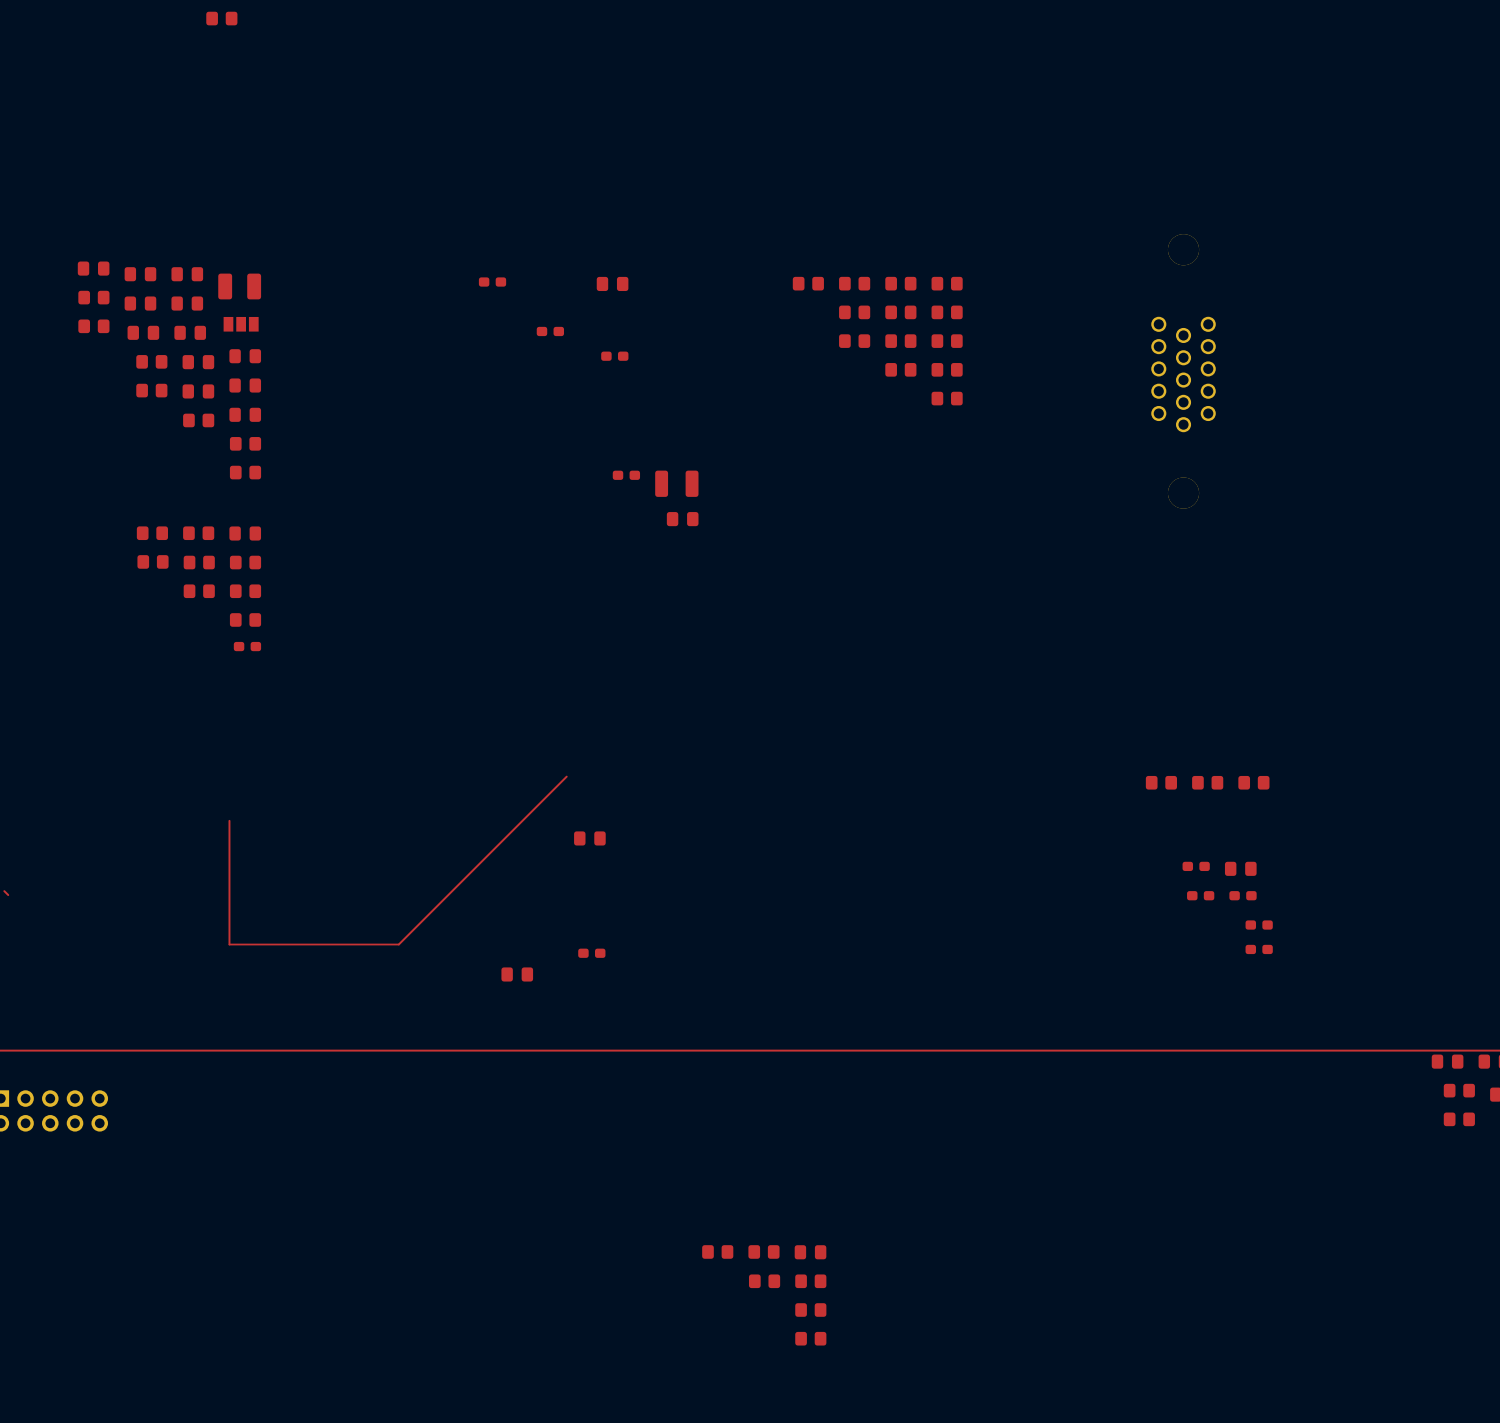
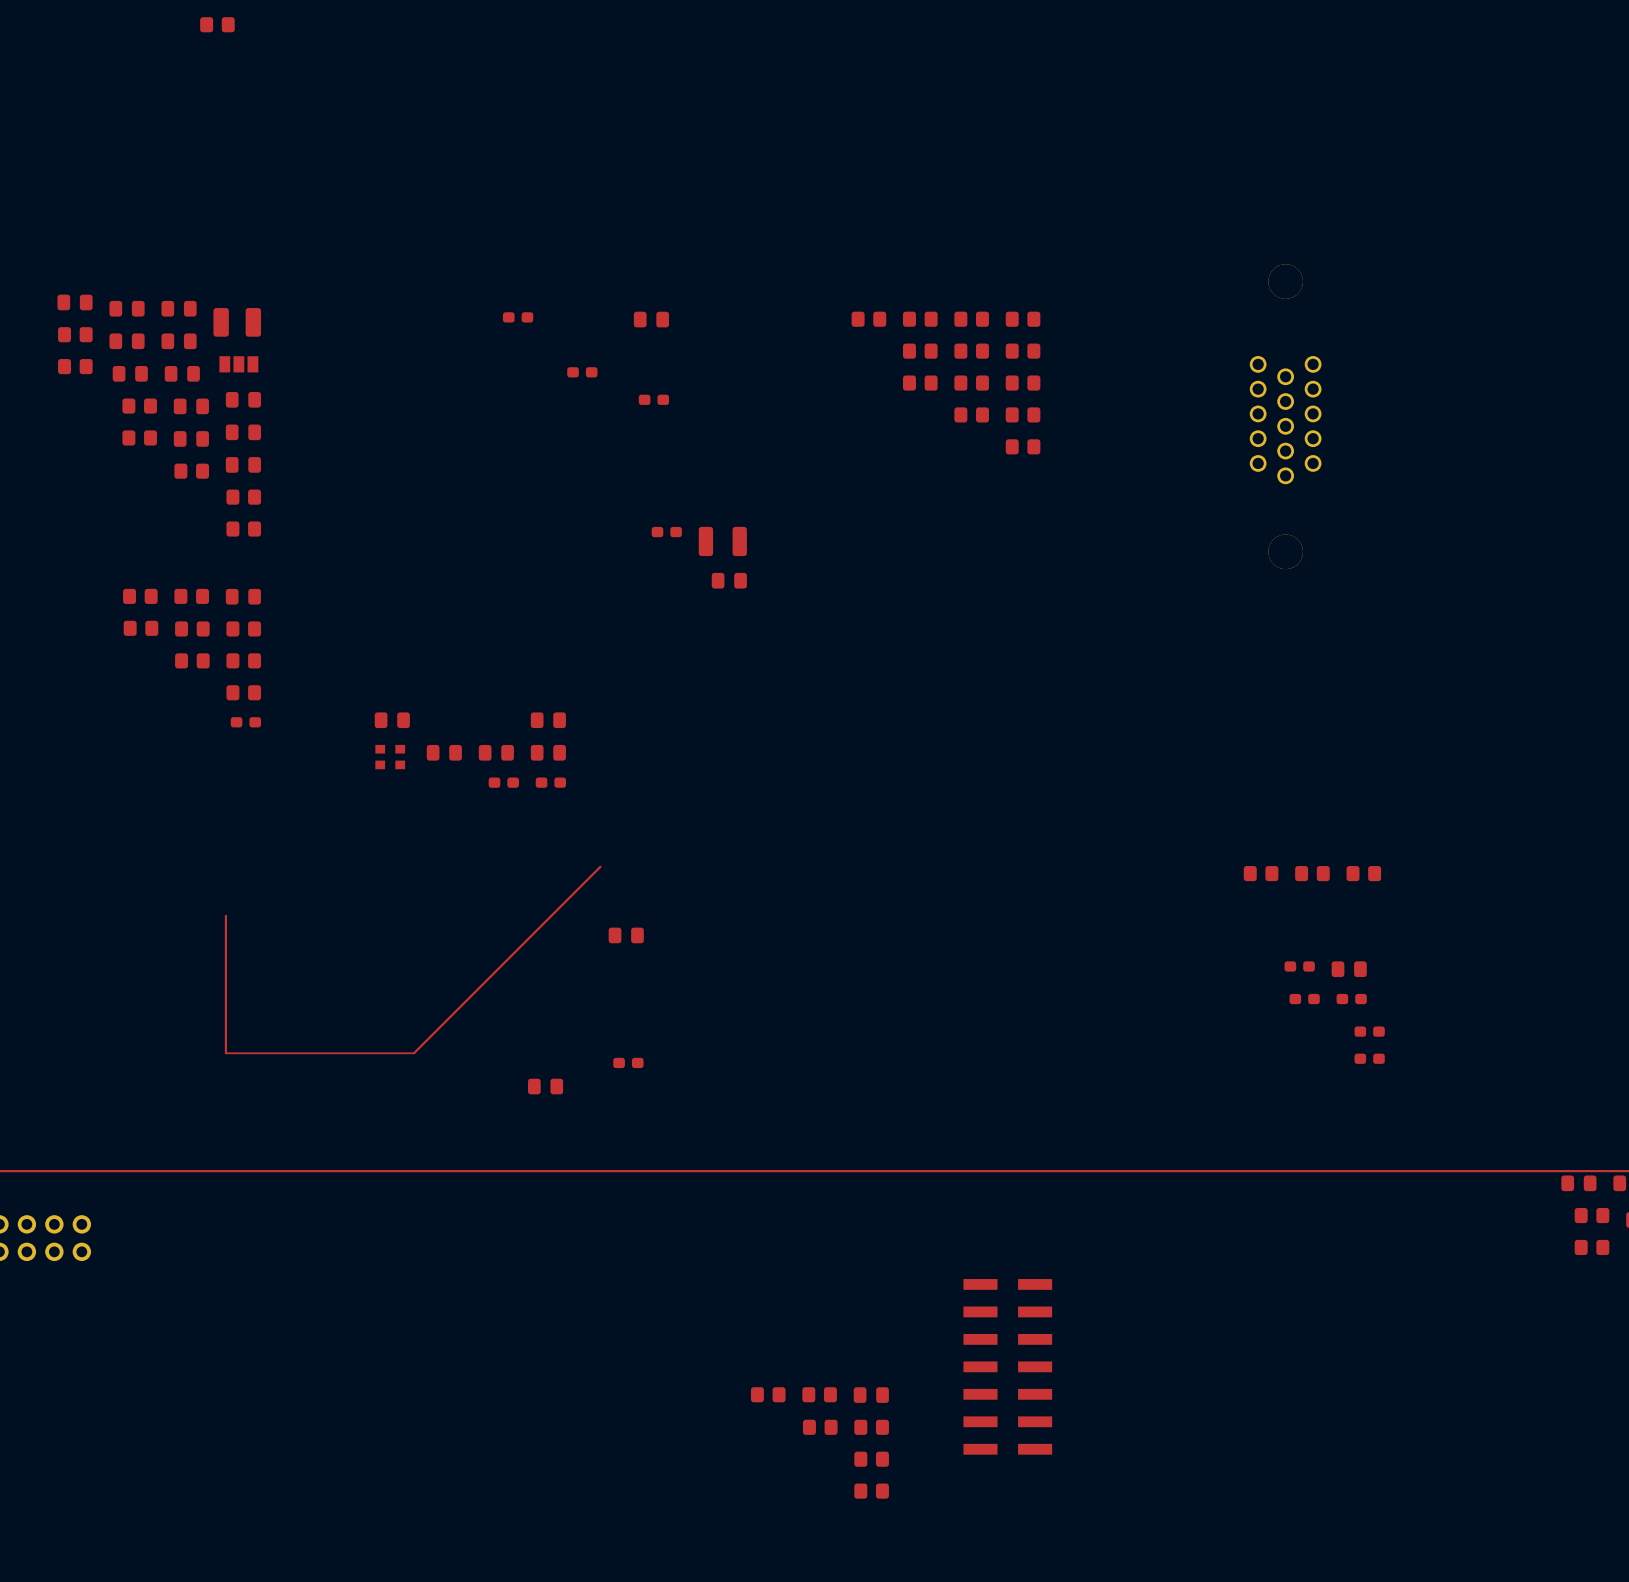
part: none -> (392, 720)
part: none -> (548, 720)
part: none -> (444, 752)
part: none -> (496, 752)
part: none -> (548, 752)
part: none -> (390, 757)
part: none -> (503, 782)
part: none -> (550, 782)
part: none -> (1007, 1366)

